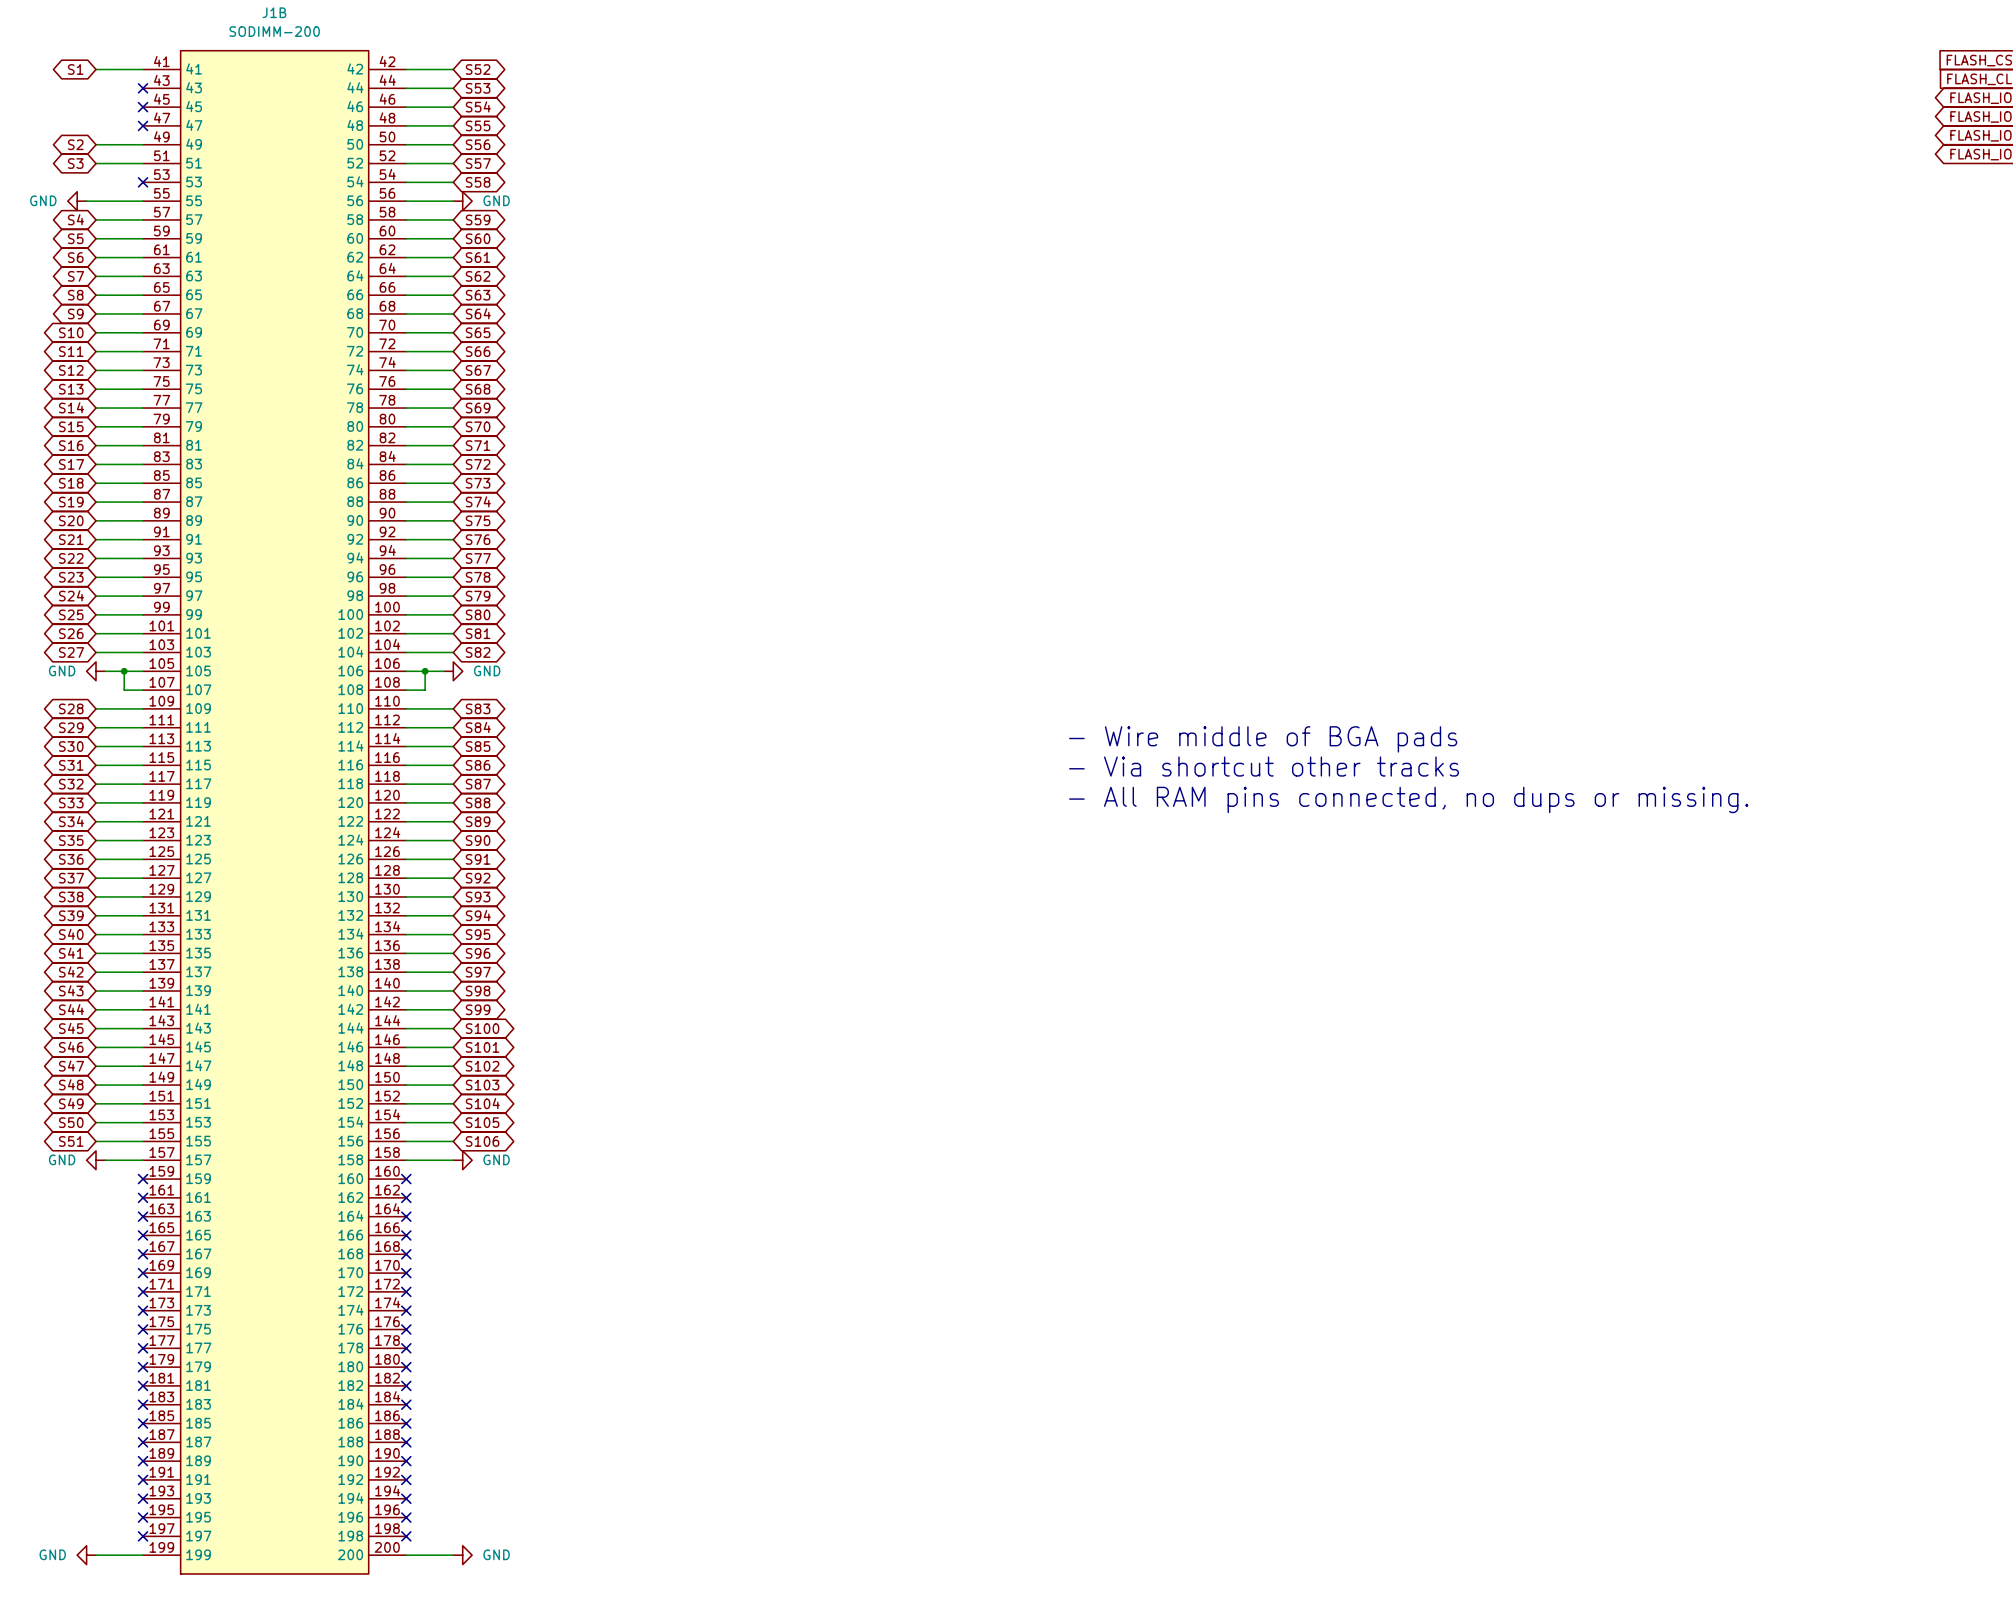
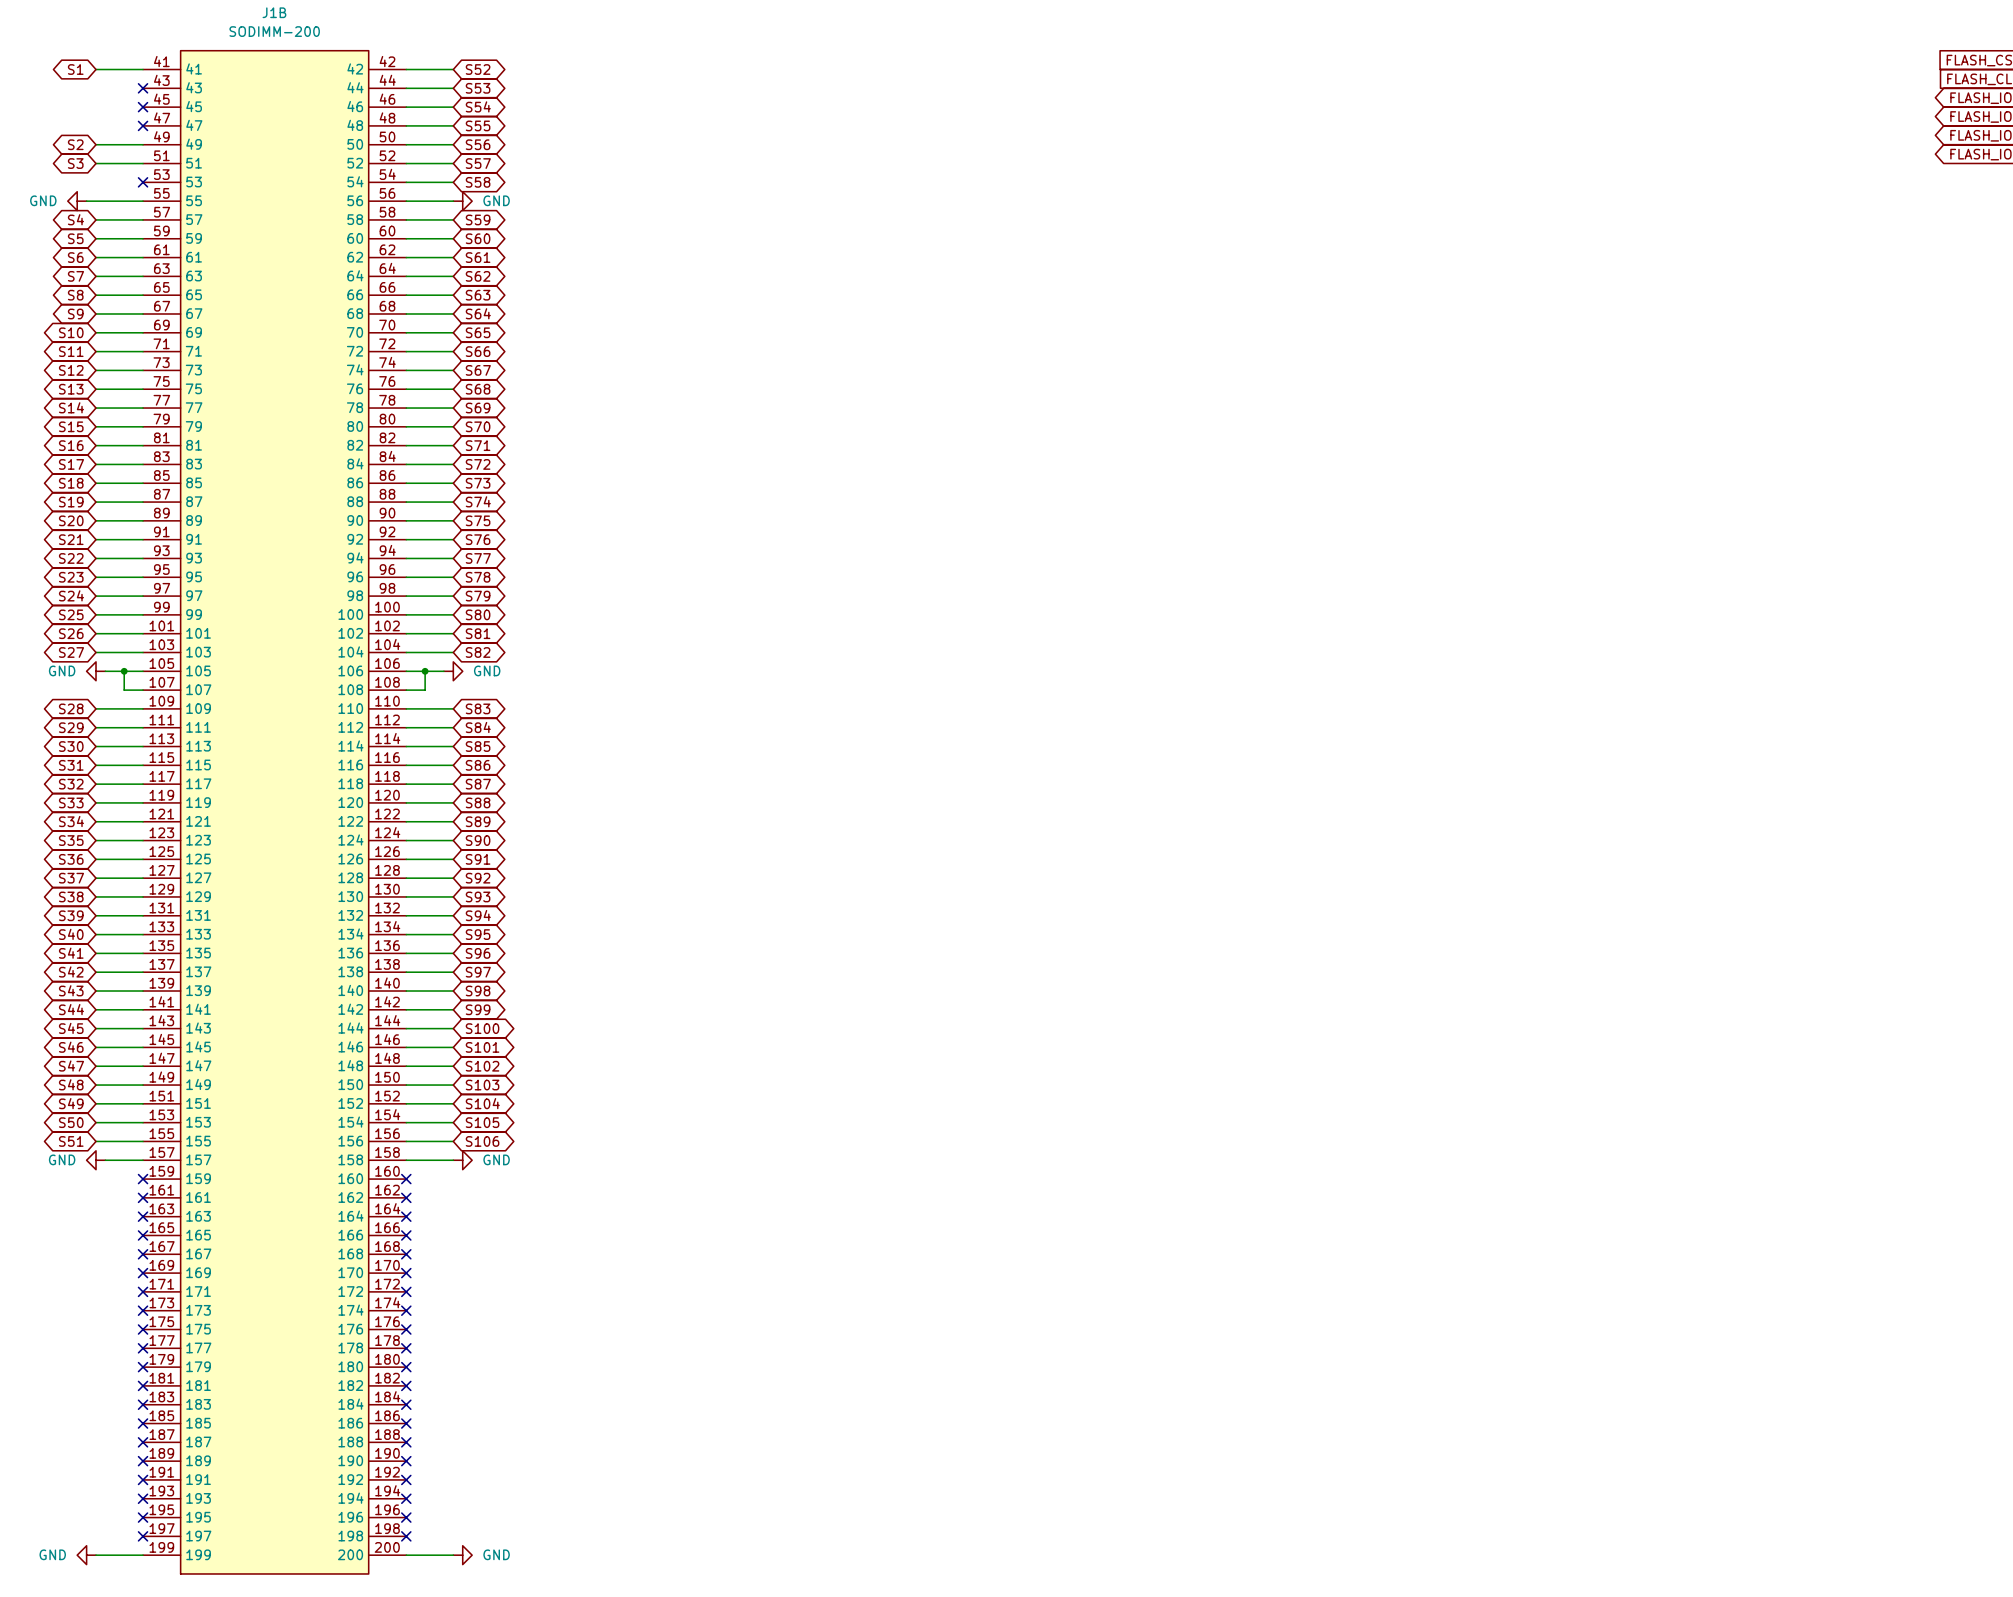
text: - Wire middle of BGA pads (1263, 739) -> none
text: - Via shortcut other tracks (1264, 766) -> none
text: - All RAM pins connected, no dups or missing. (1408, 799) -> none

